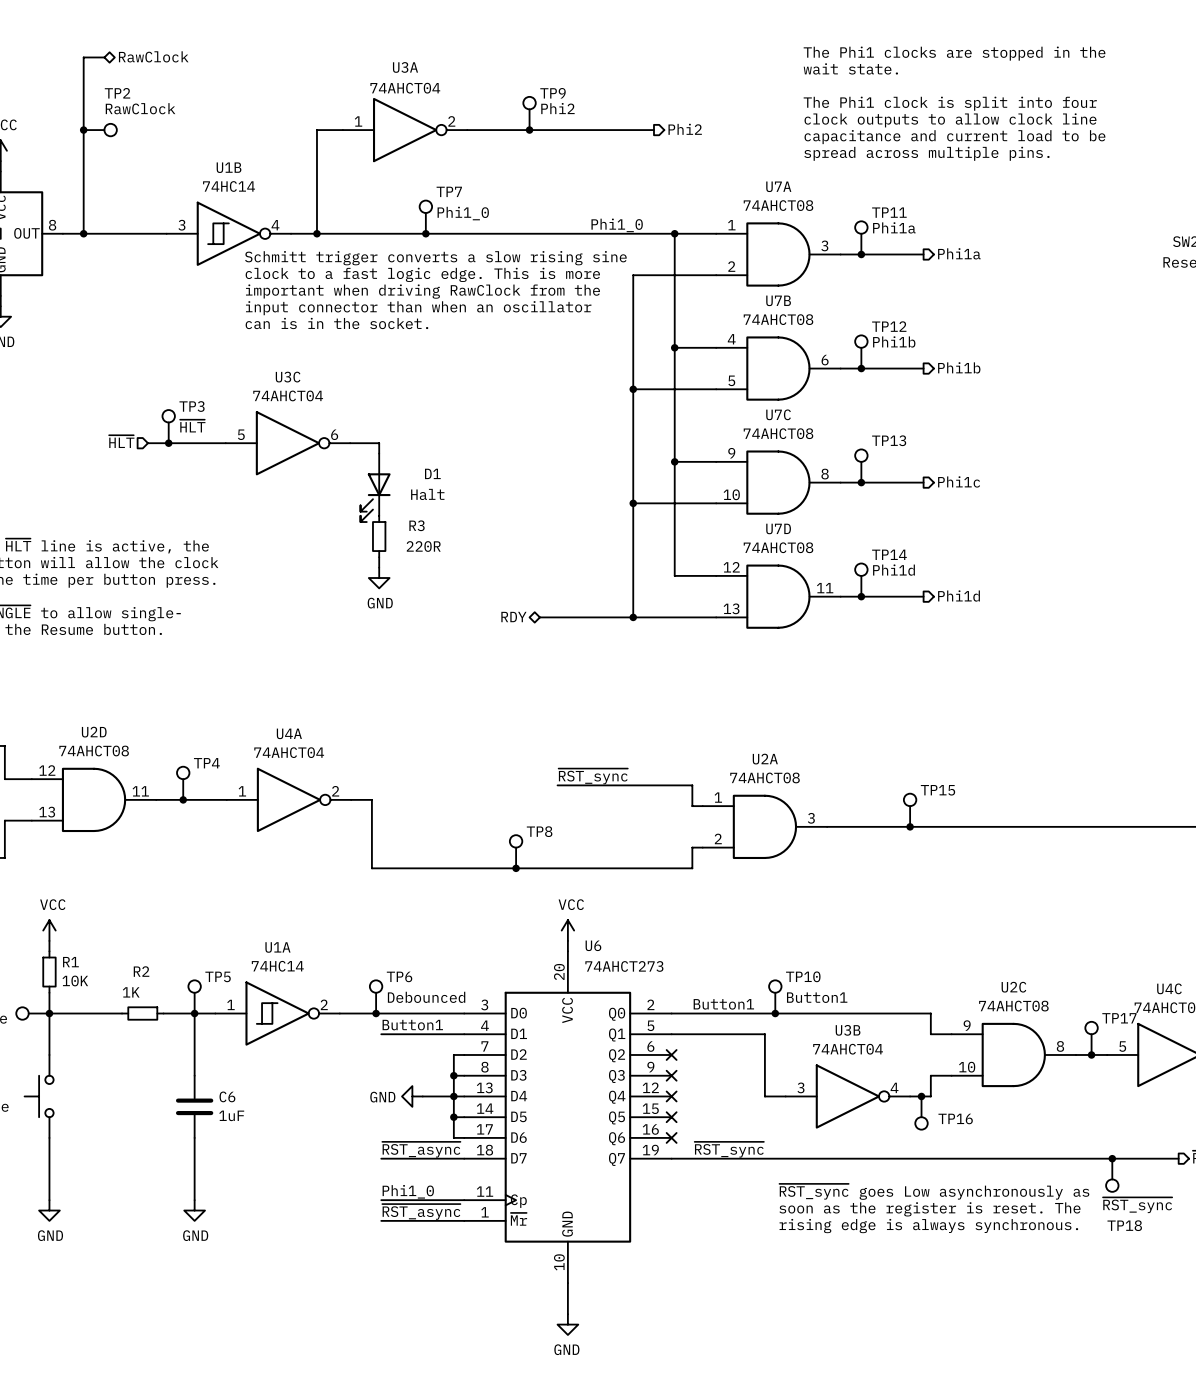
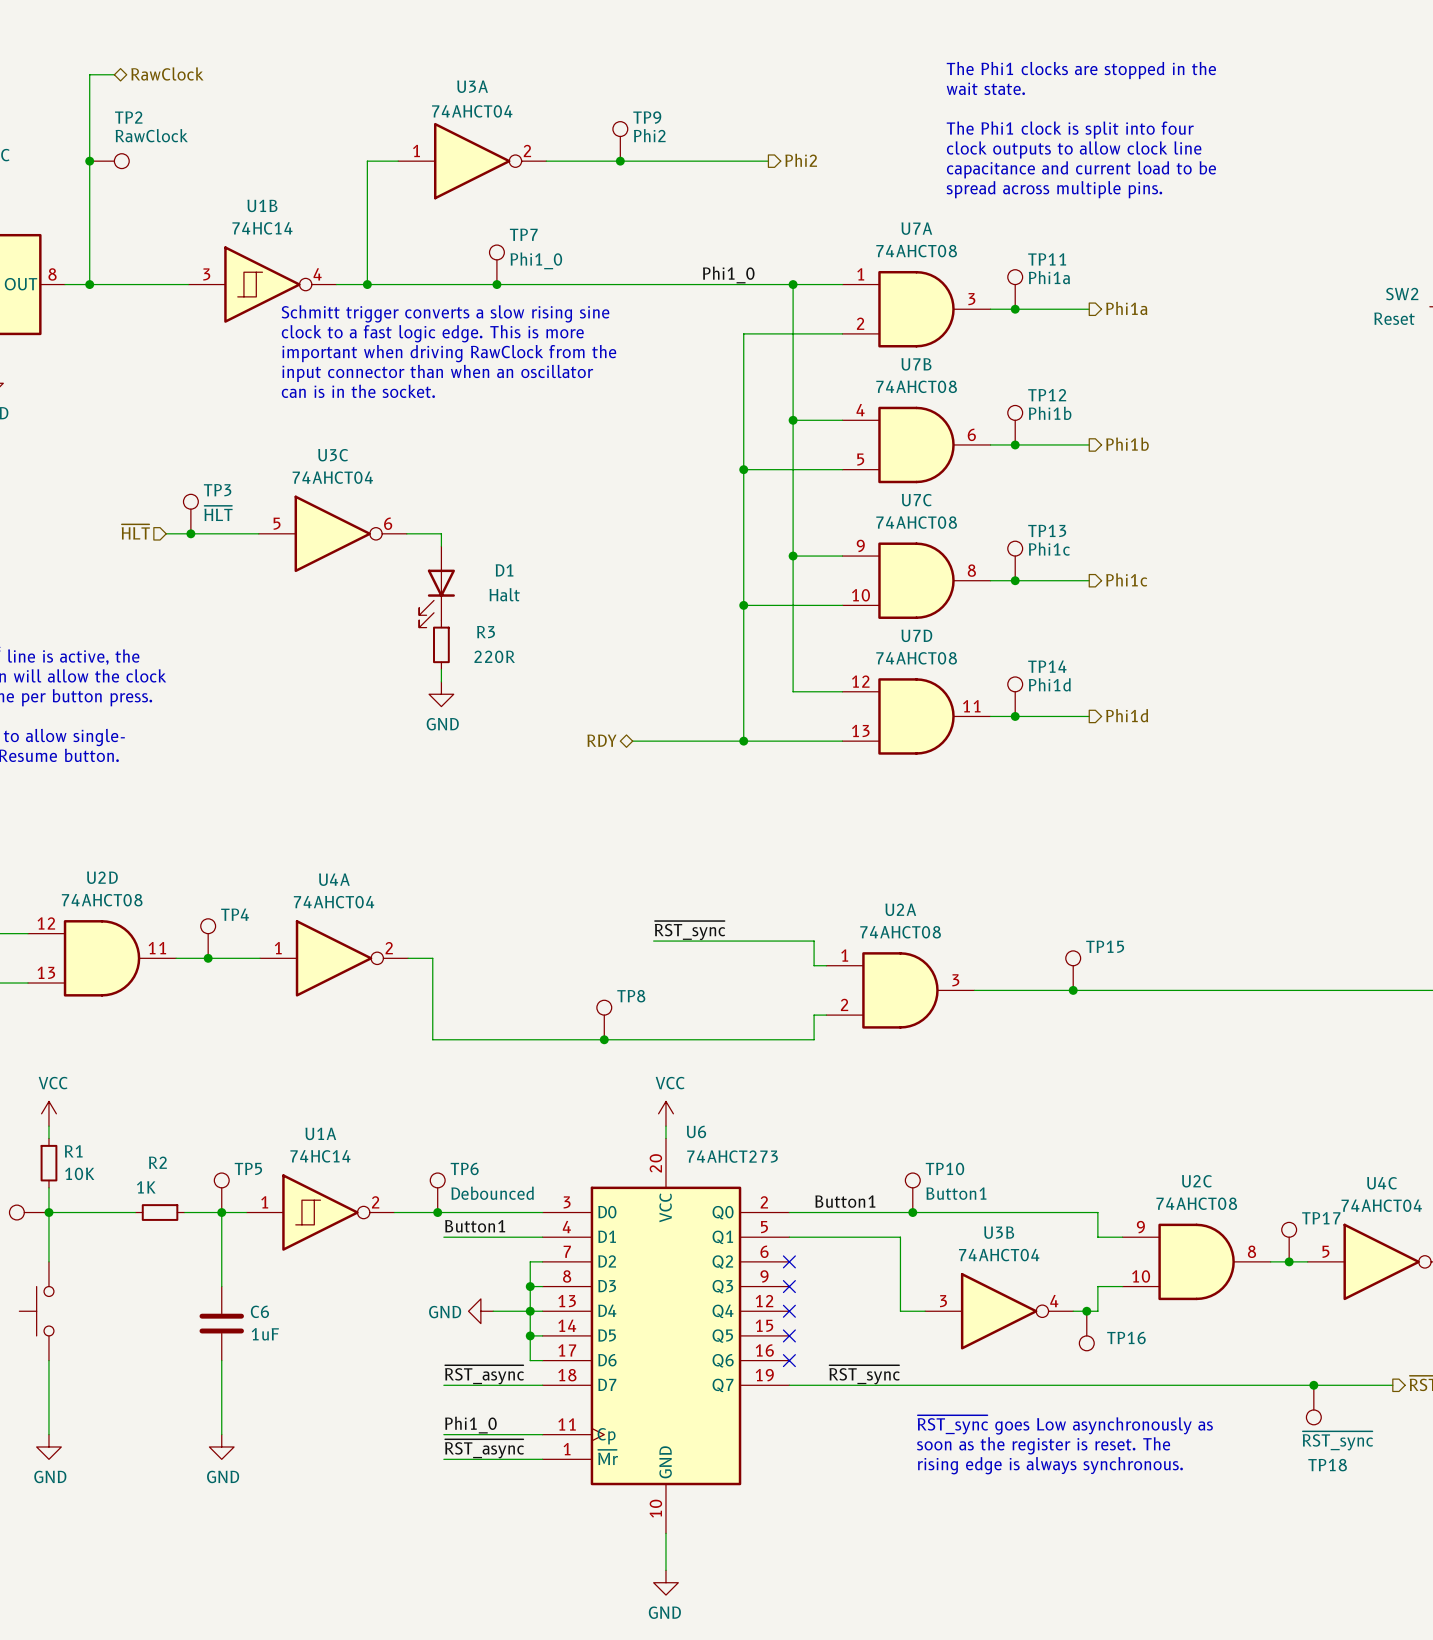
TP13 value: none -> Phi1c (1049, 549)

